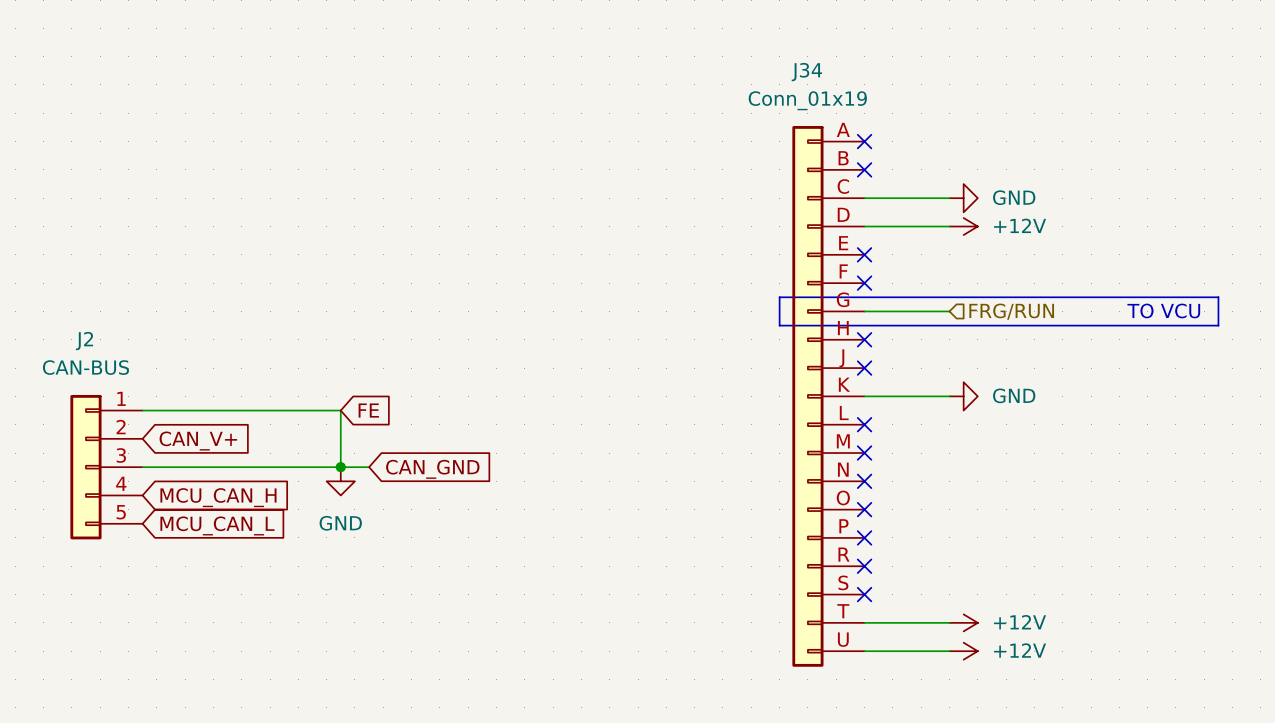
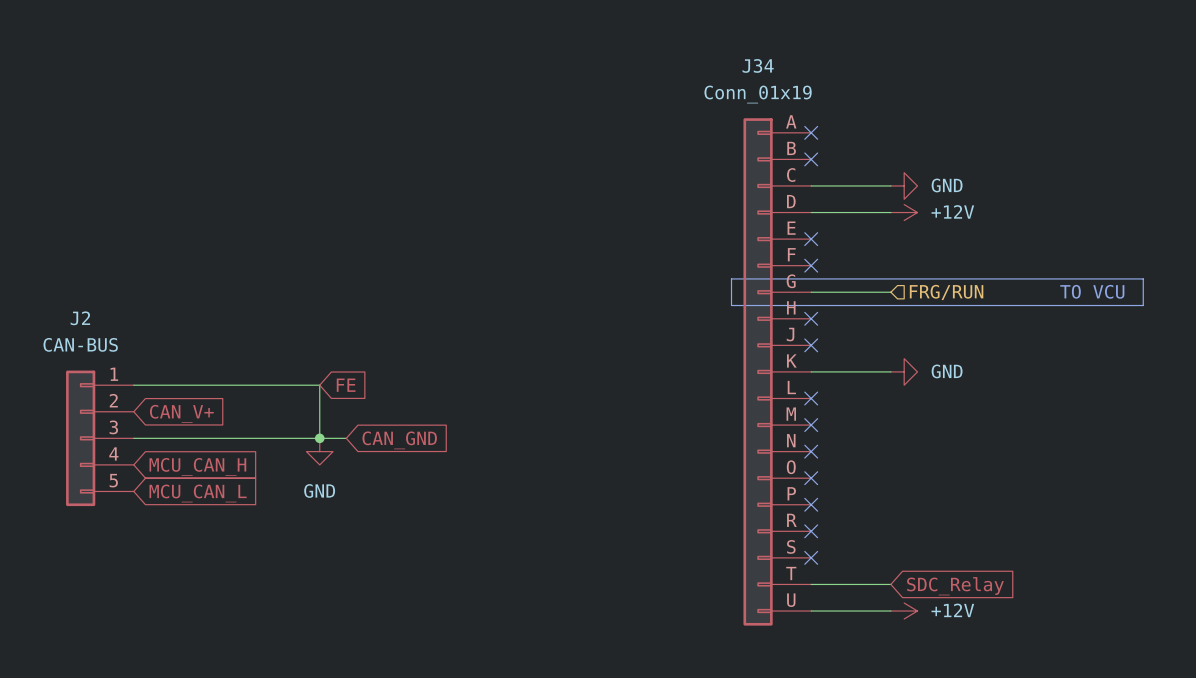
power symbol: +12V (963, 622) -> none
global label: none -> SDC_Relay (955, 586)

